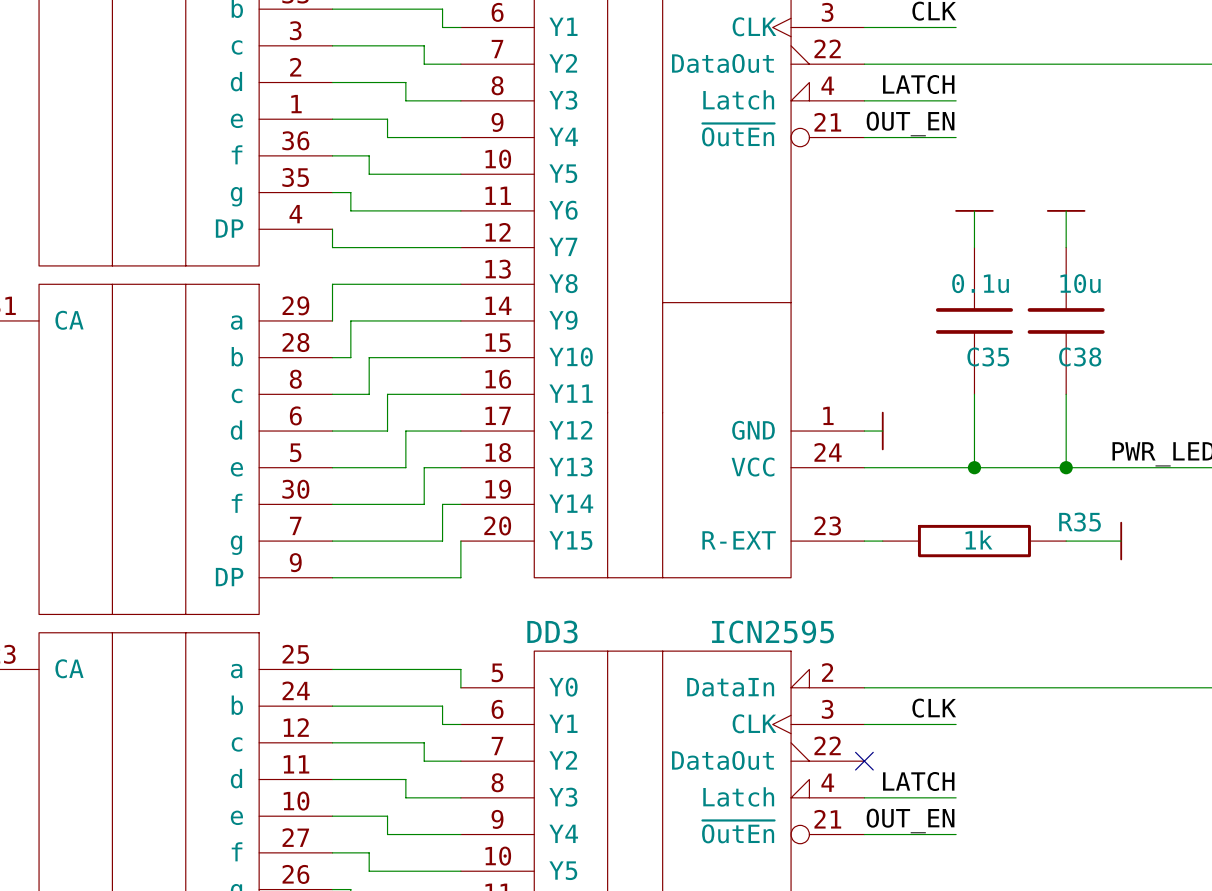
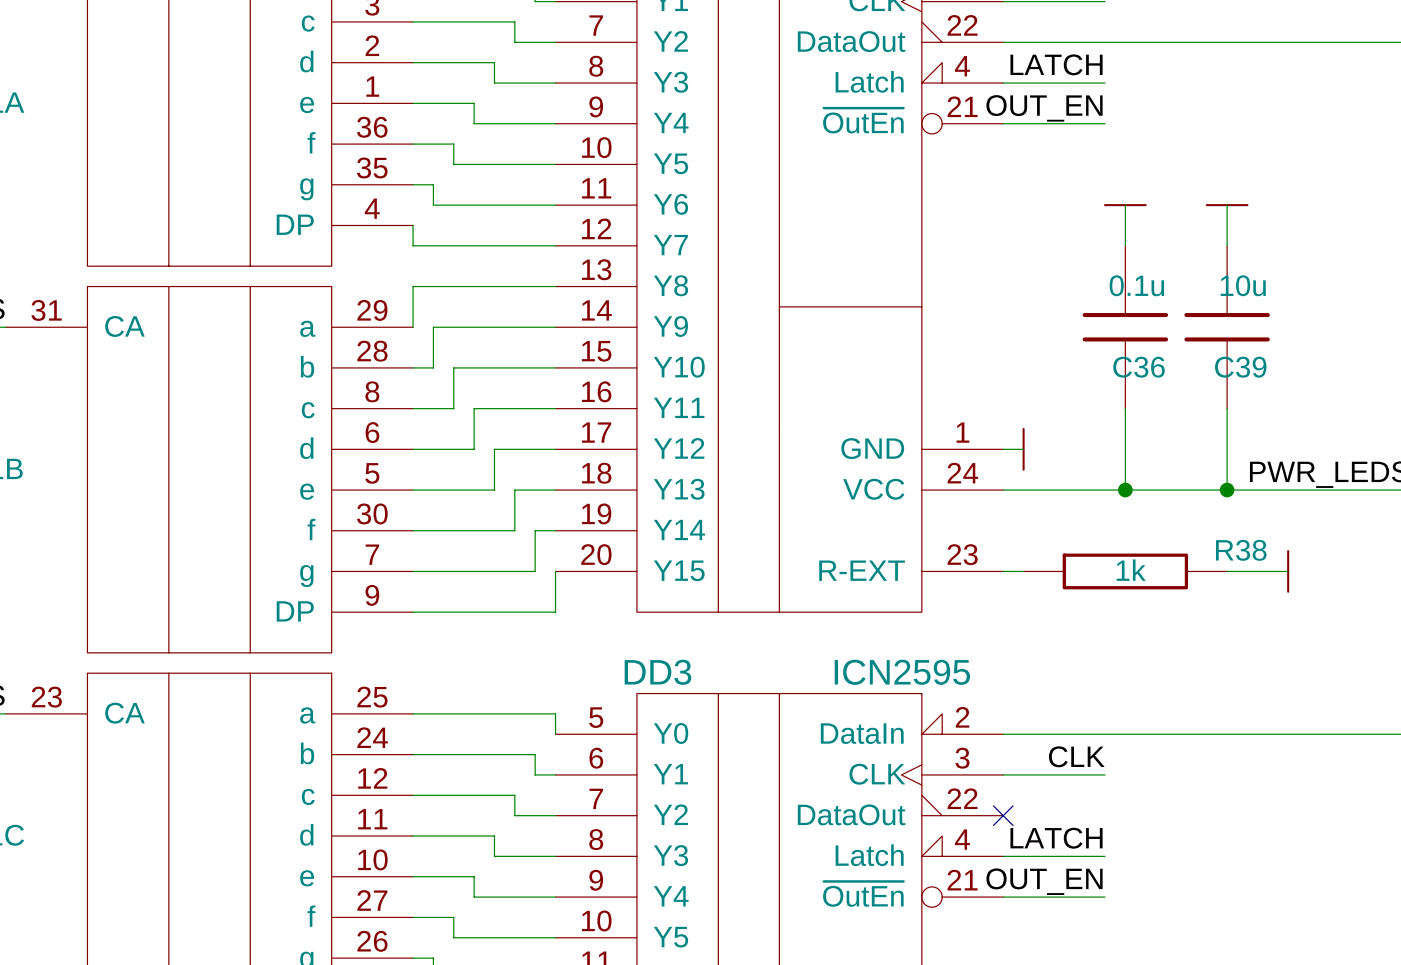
C35 name: C35 (988, 356) -> C36 (1139, 367)
C38 name: C38 (1080, 356) -> C39 (1240, 367)
R35 name: R35 (1080, 522) -> R38 (1241, 550)

